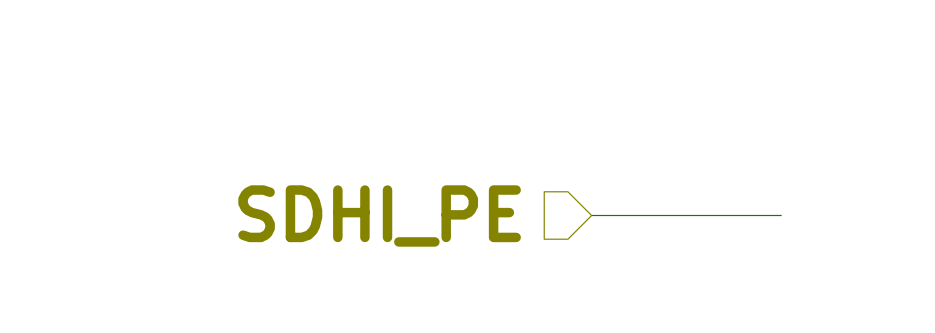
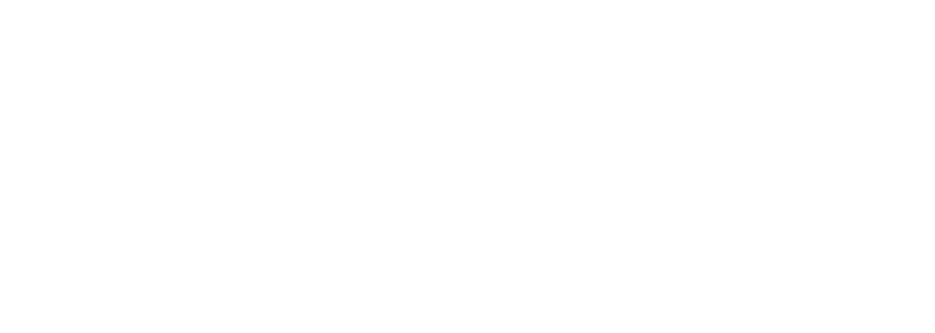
hierarchical label: SDHI_PE (379, 215) -> none
wire: (591, 215) (781, 215) -> none

